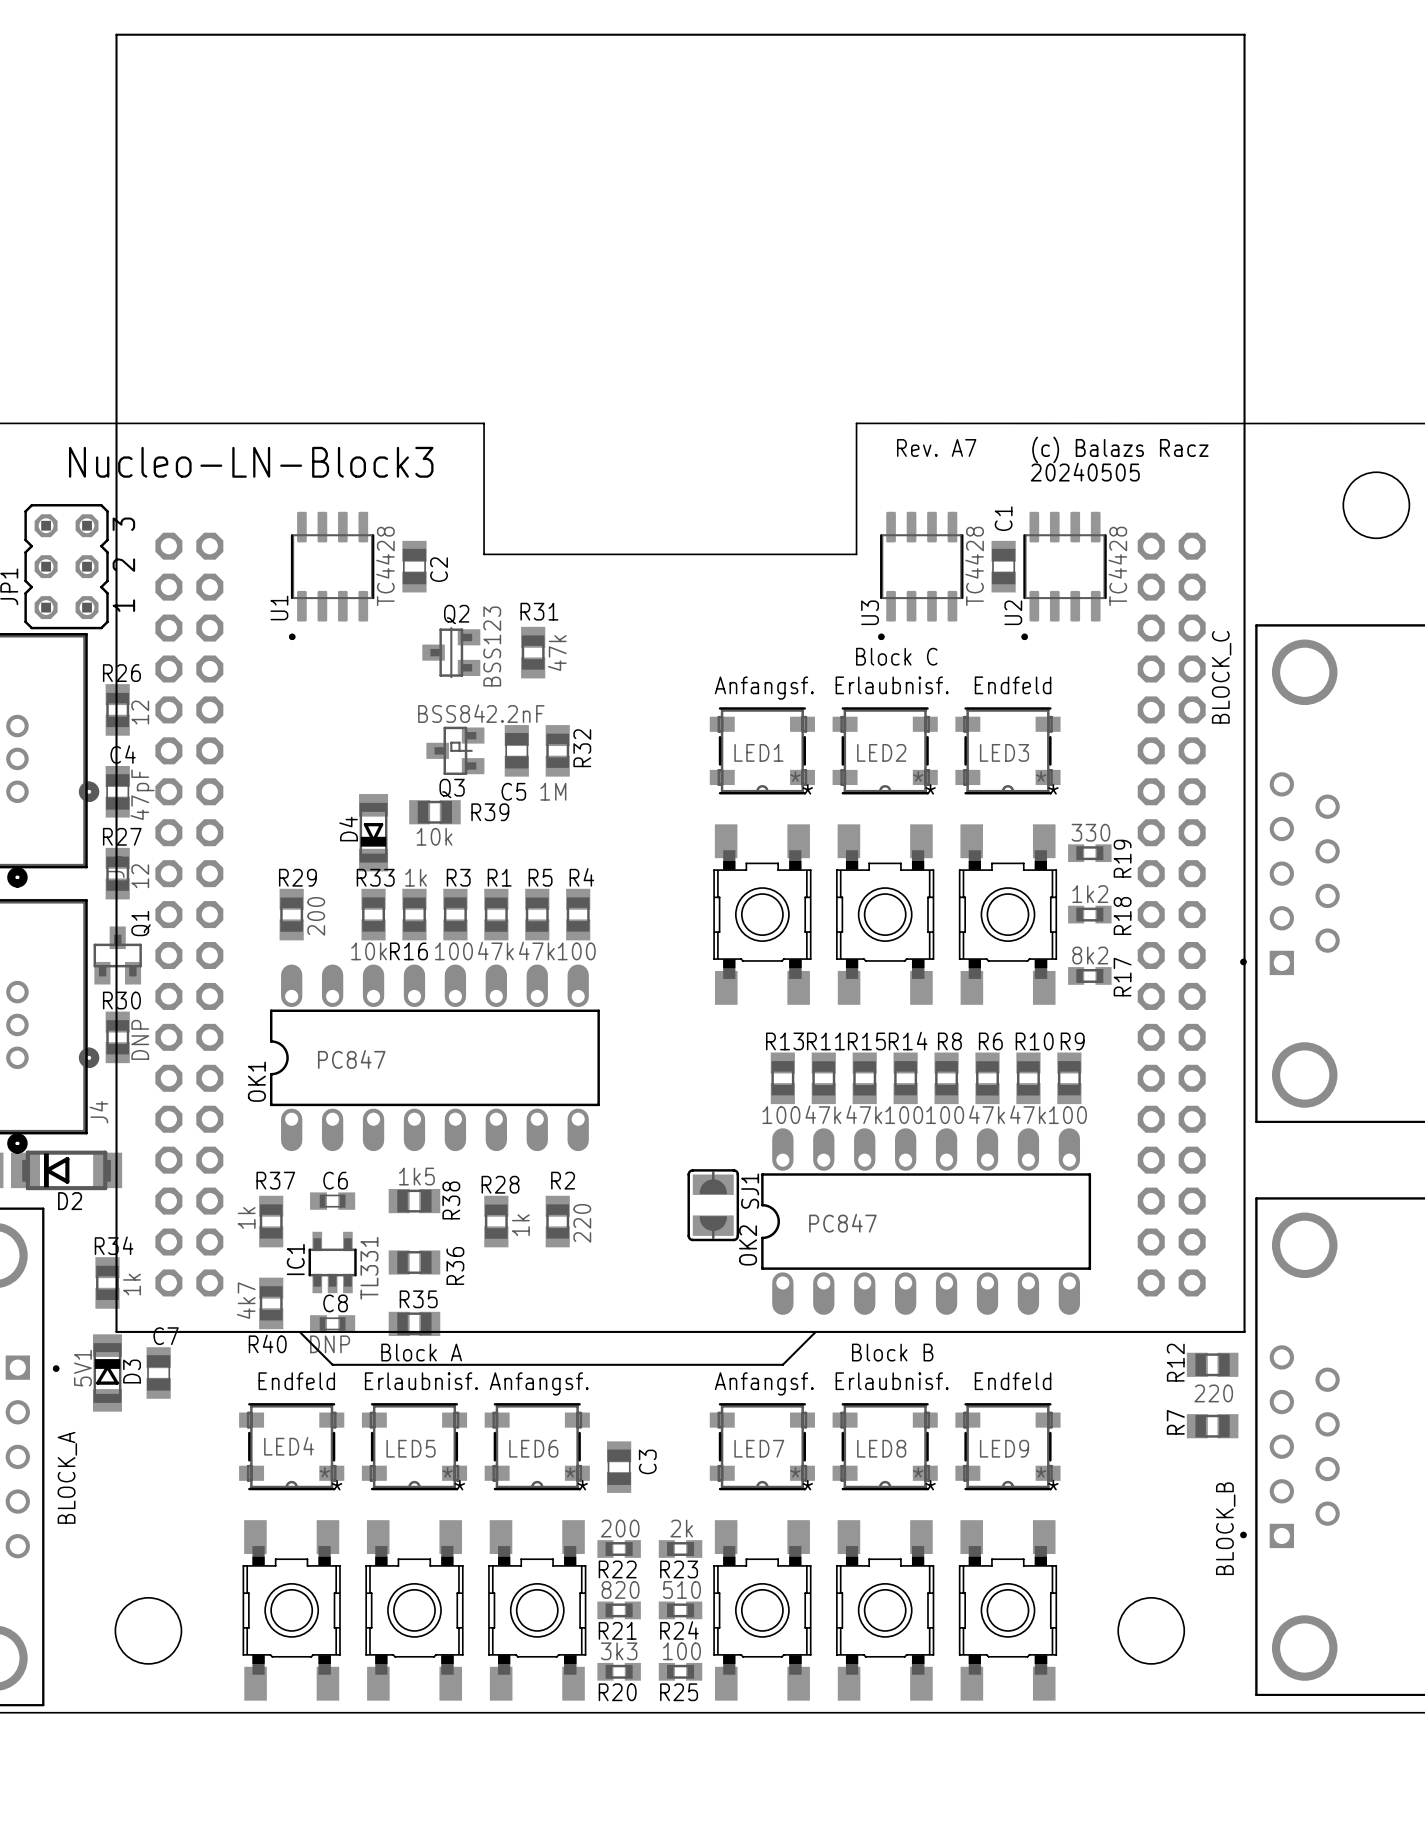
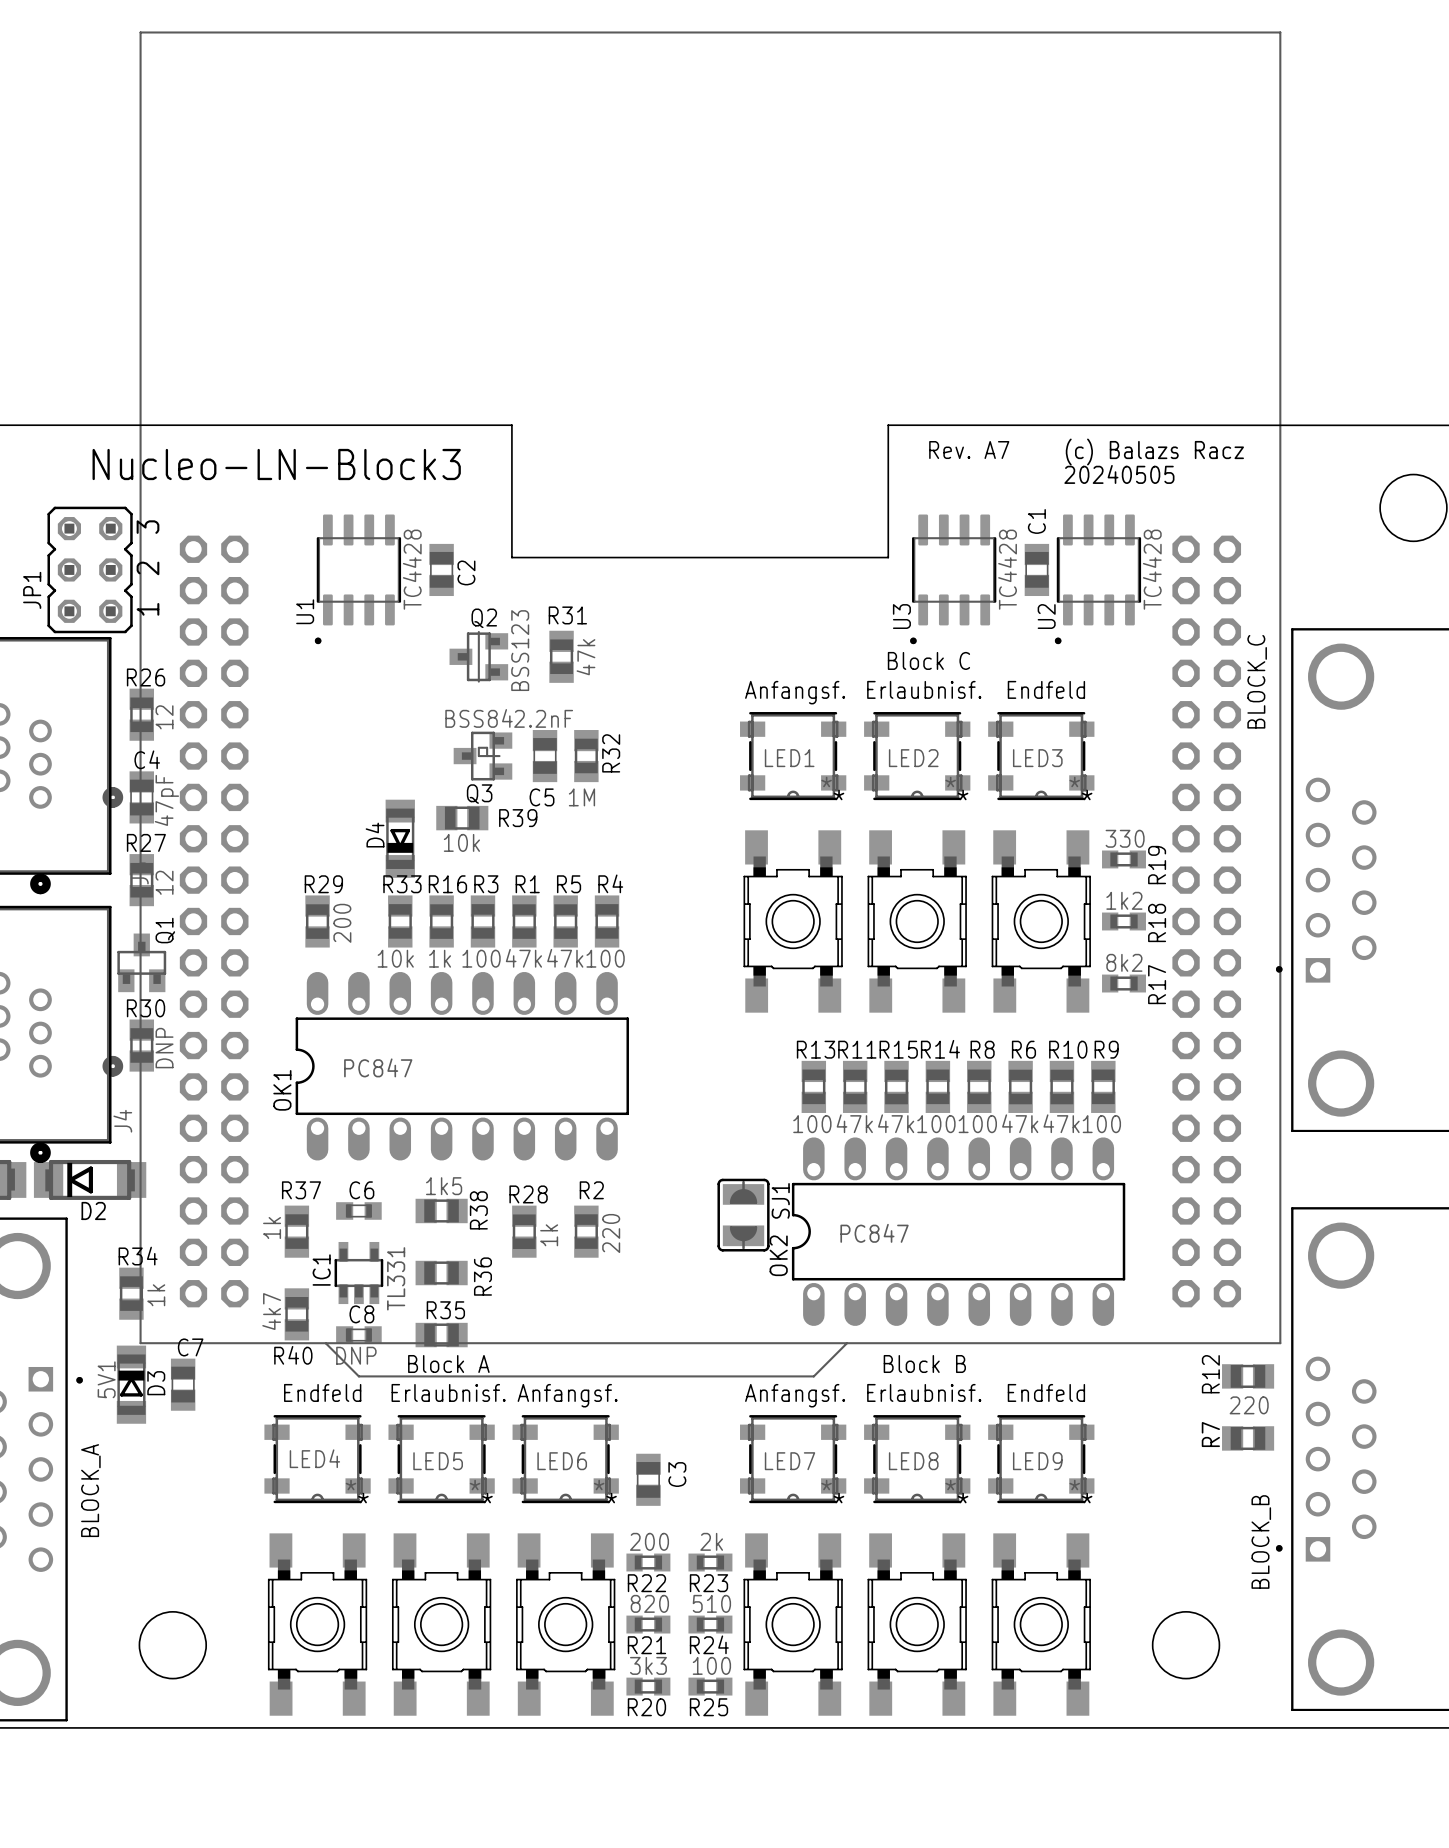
part footprint: [115, 33, 1246, 1366] -> [139, 31, 1282, 1378]
R16 value position: 1k (416, 877) -> 1k (440, 958)
R16 name position: R16 (408, 951) -> R16 (447, 884)

